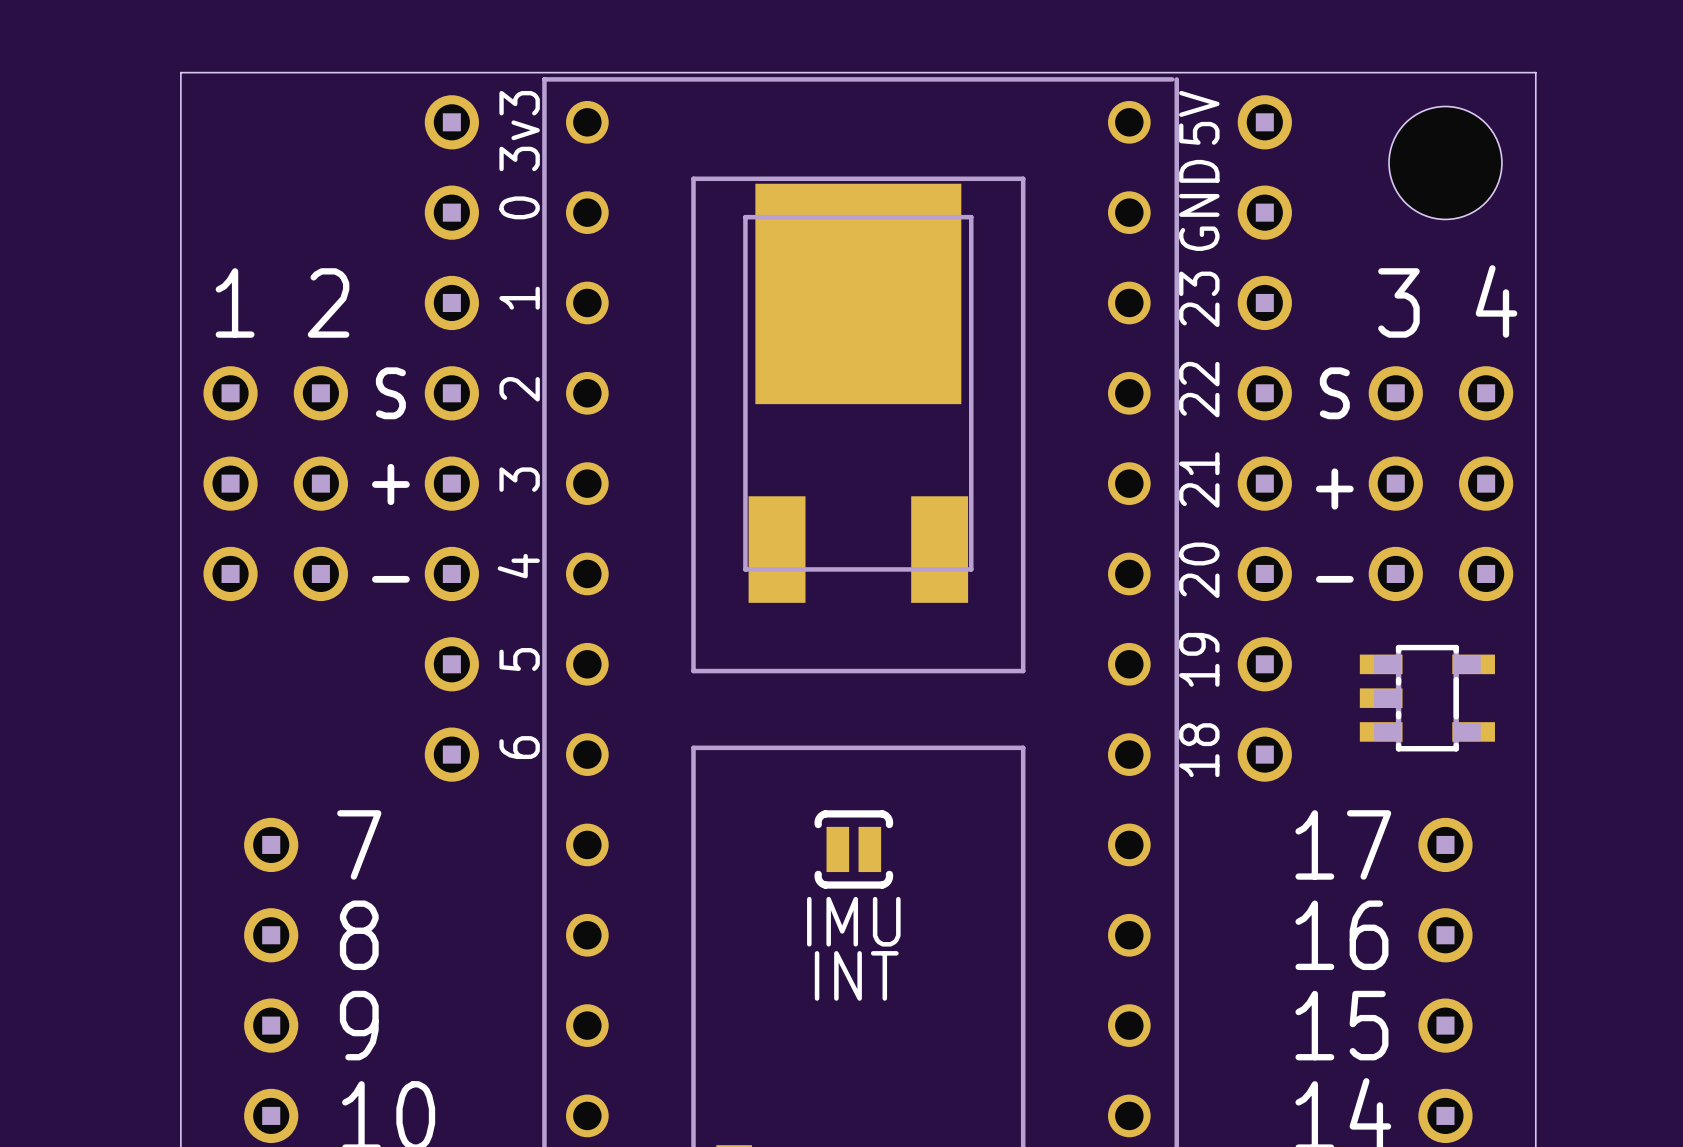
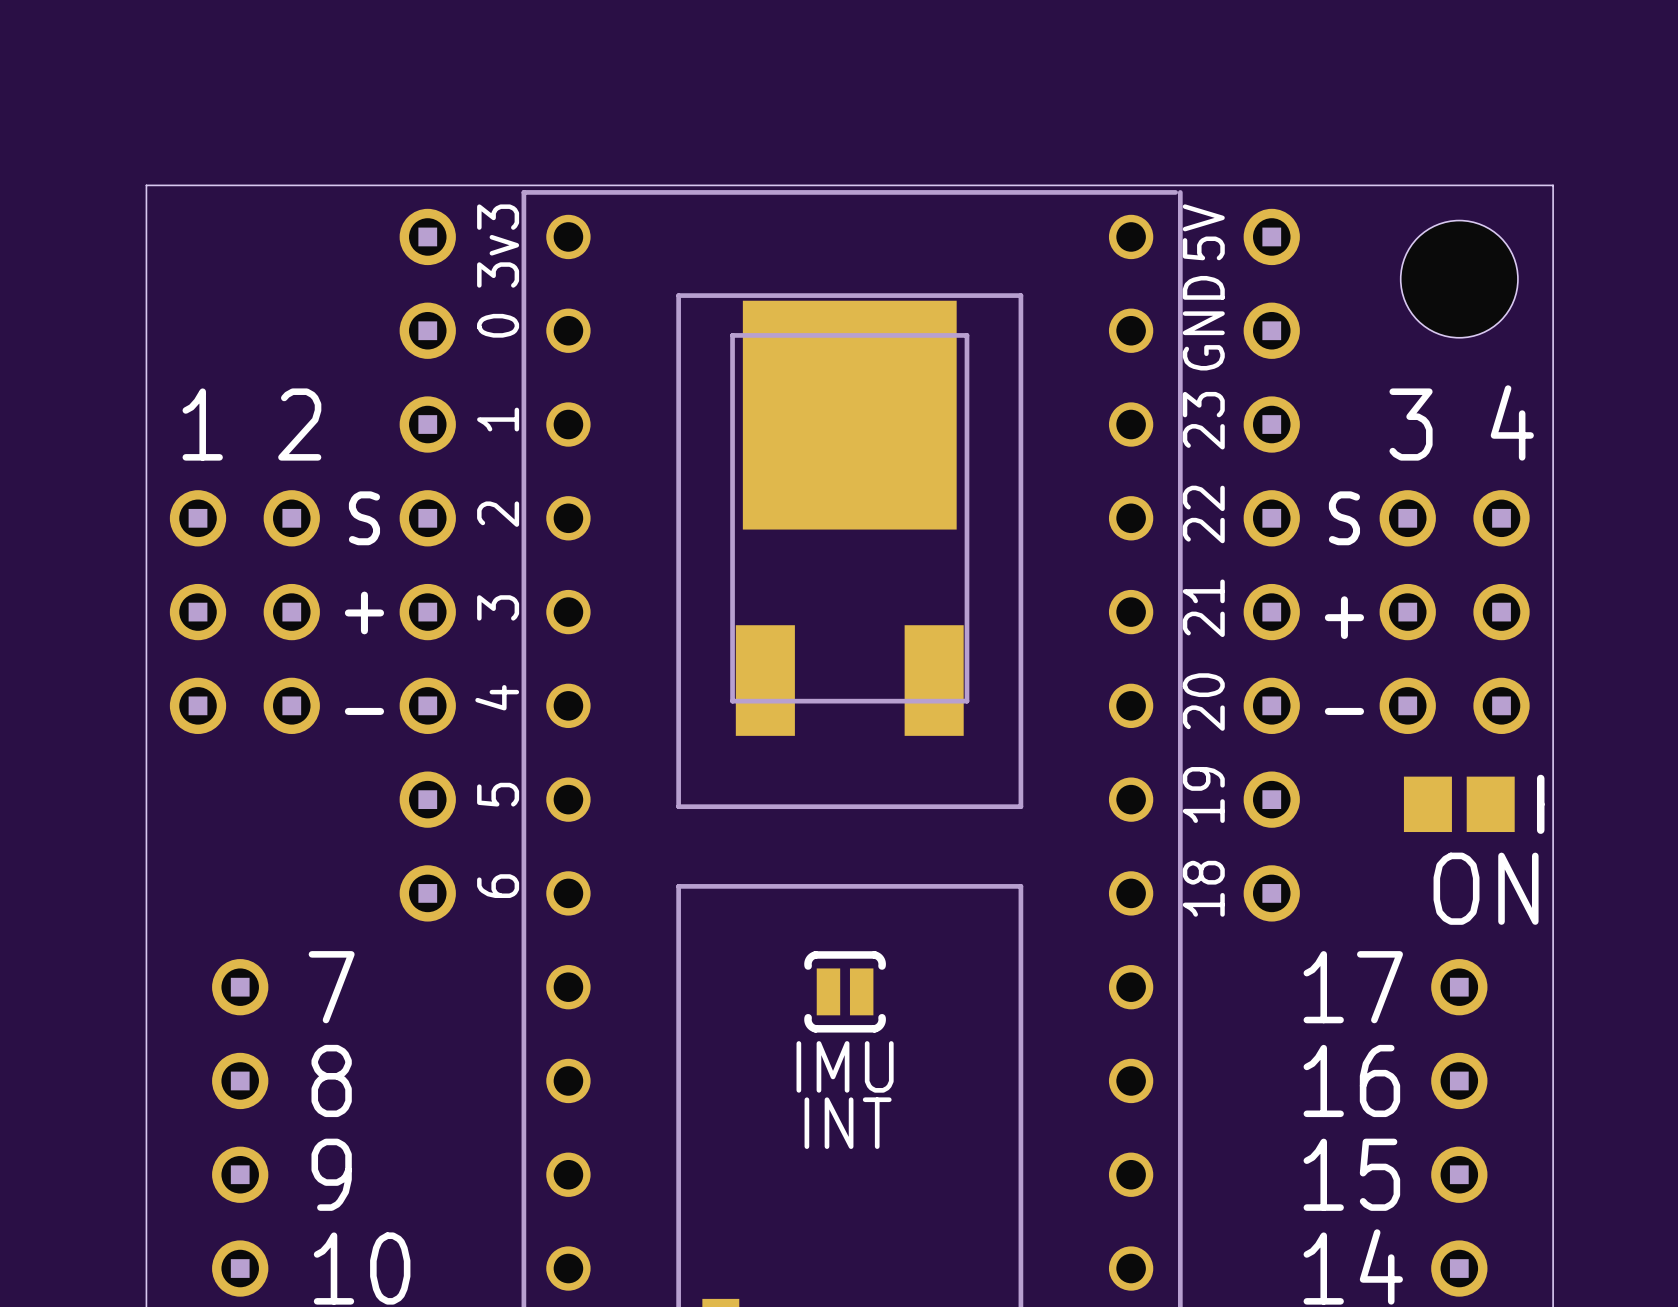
part: none -> (1474, 804)
part: (1427, 698) -> none
text: none -> ON (1486, 888)

